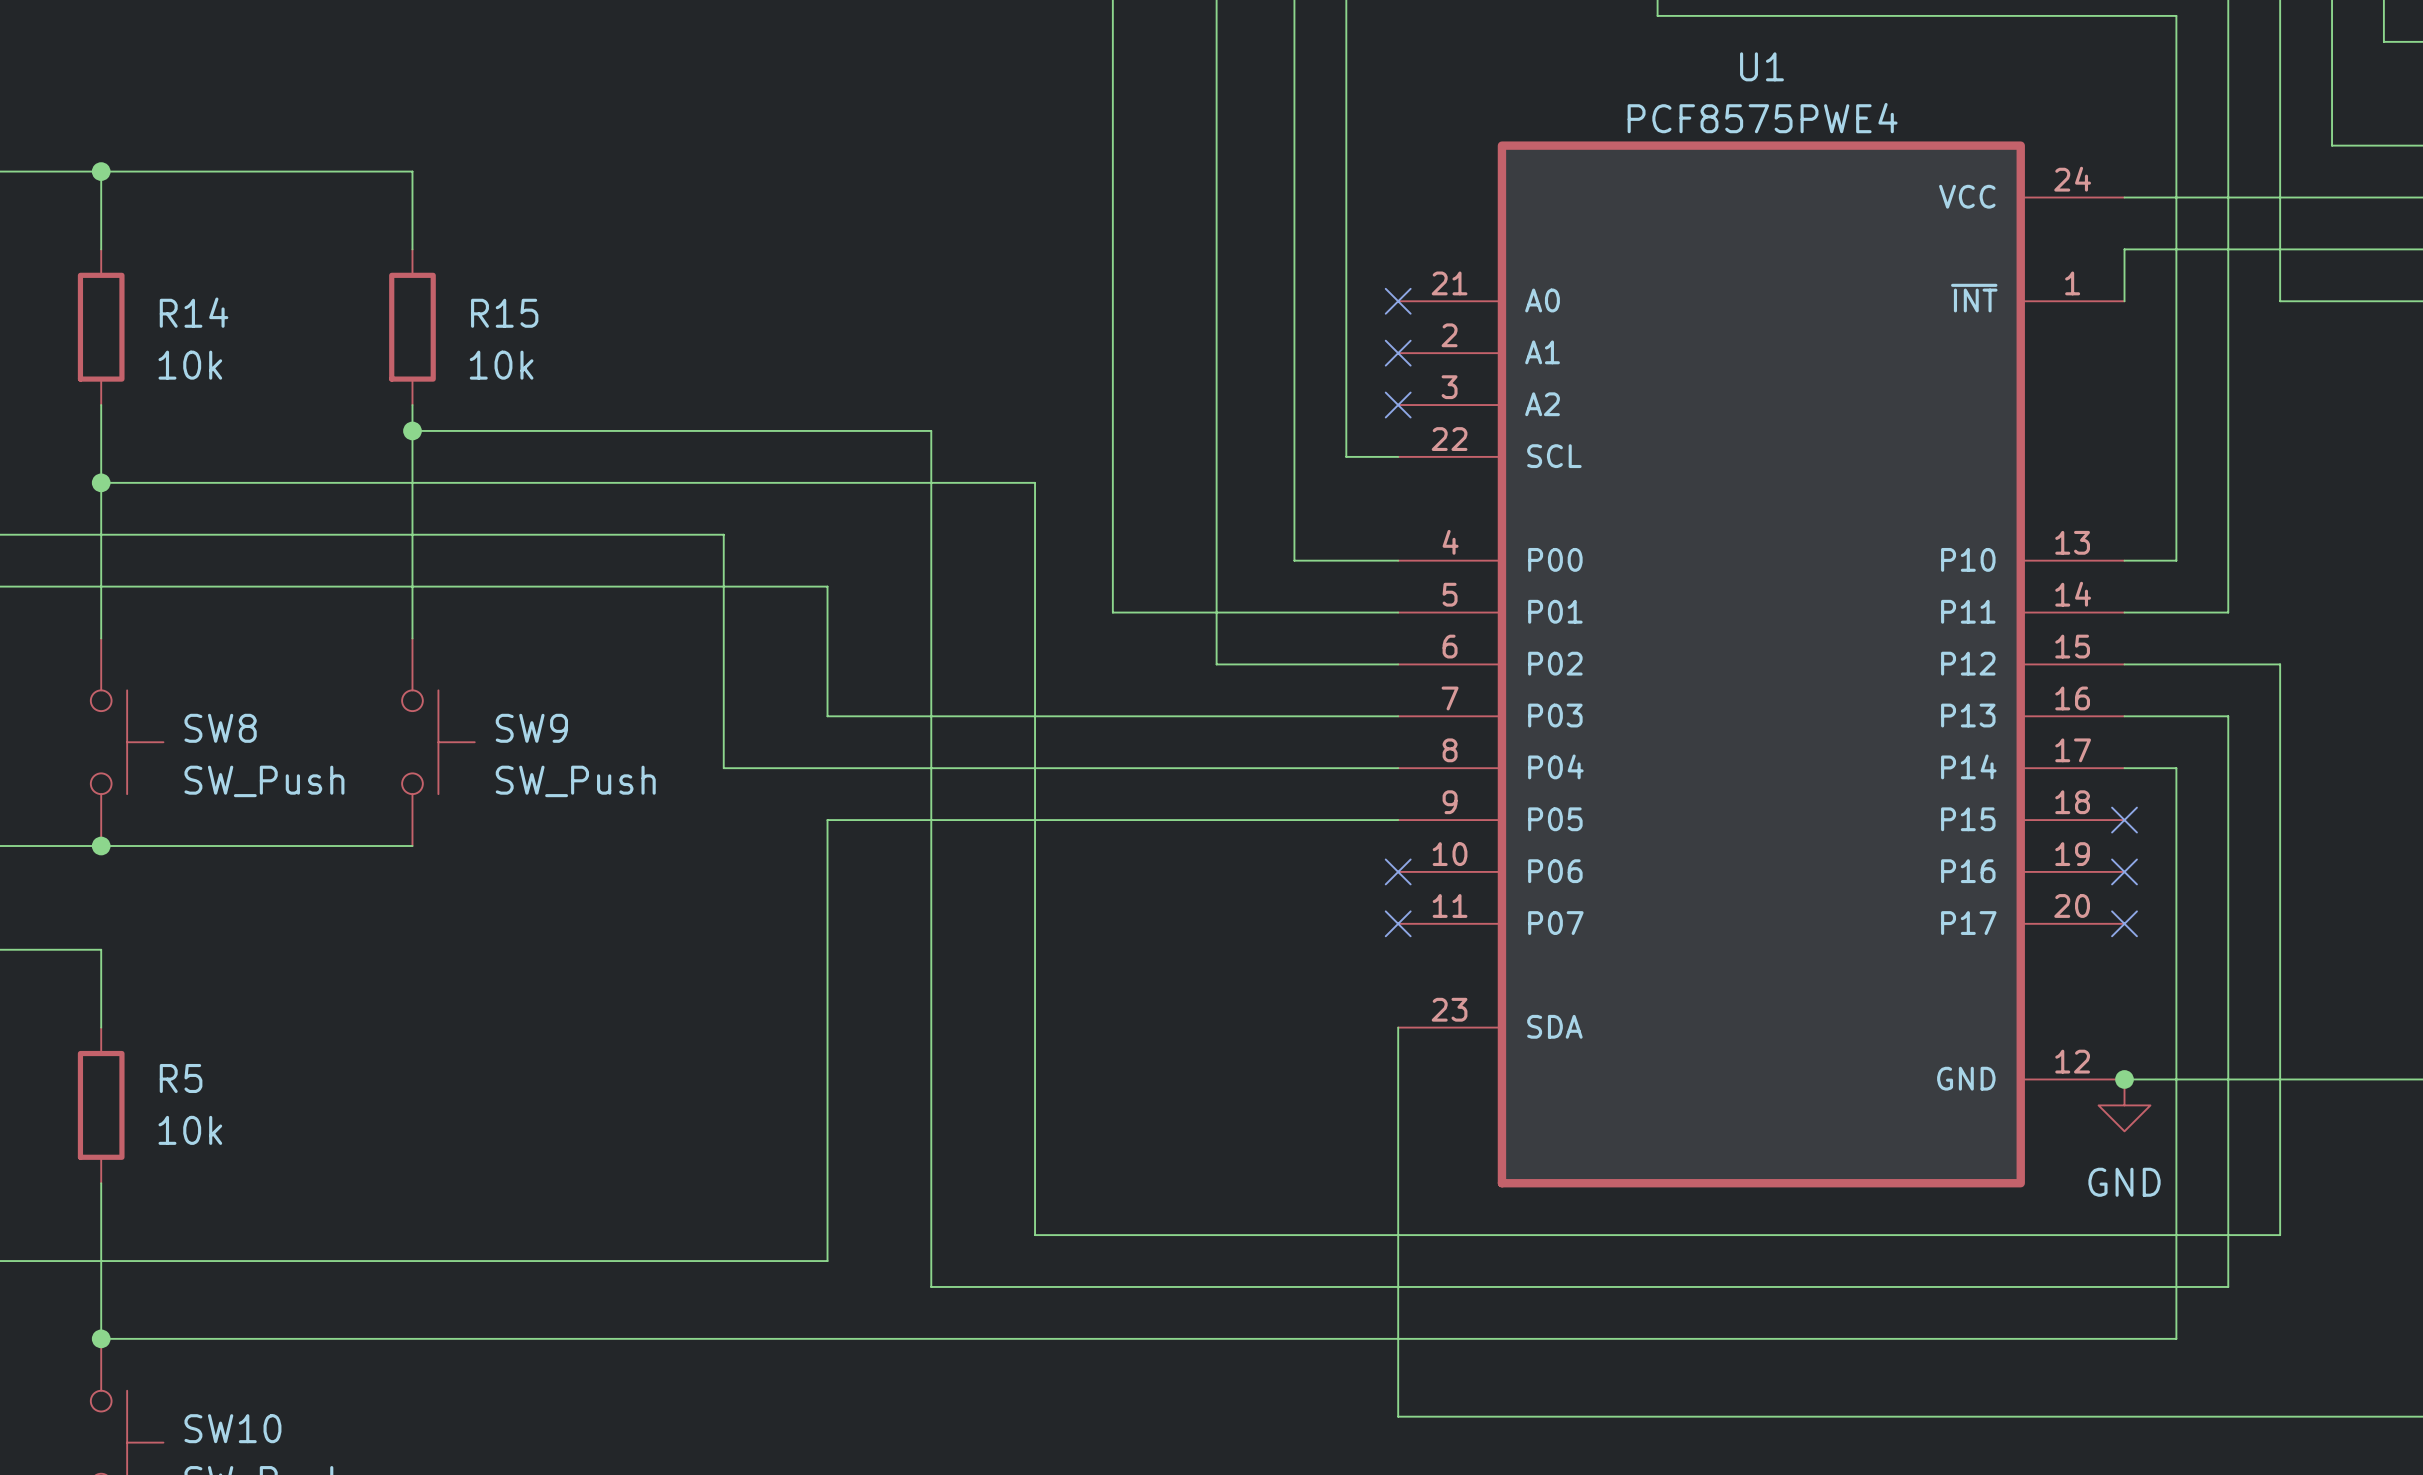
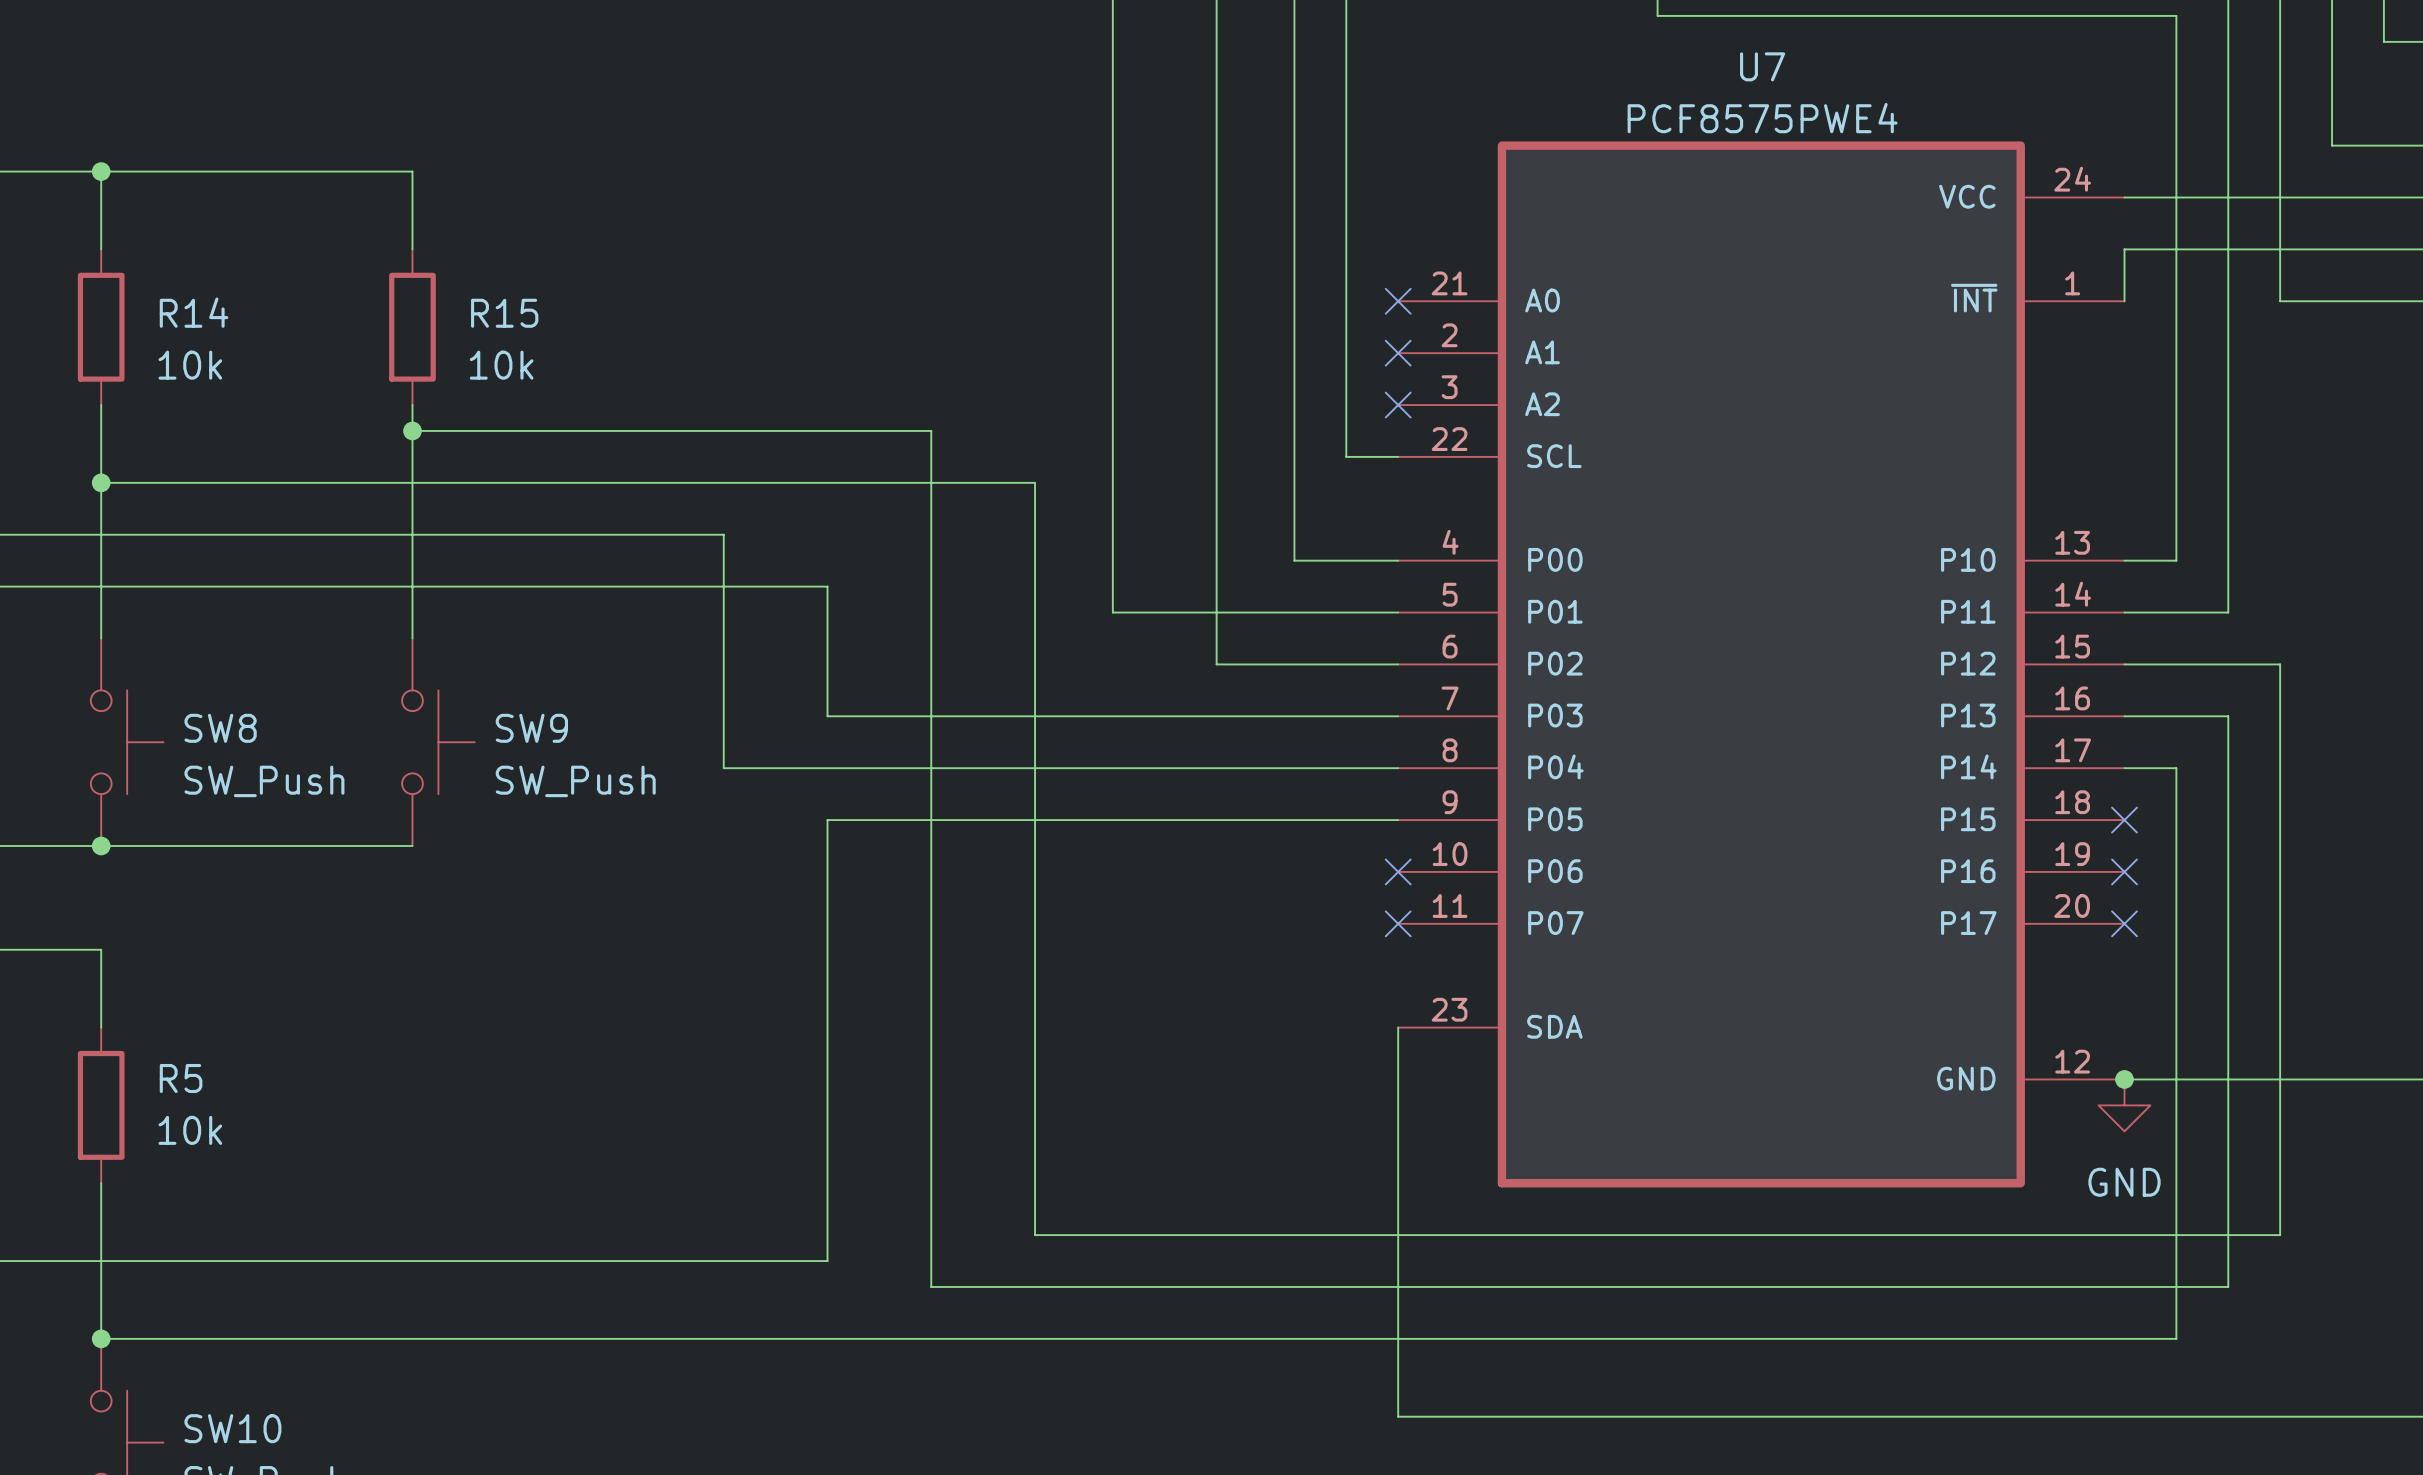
U1 name: U1 (1761, 66) -> U7 (1762, 66)

